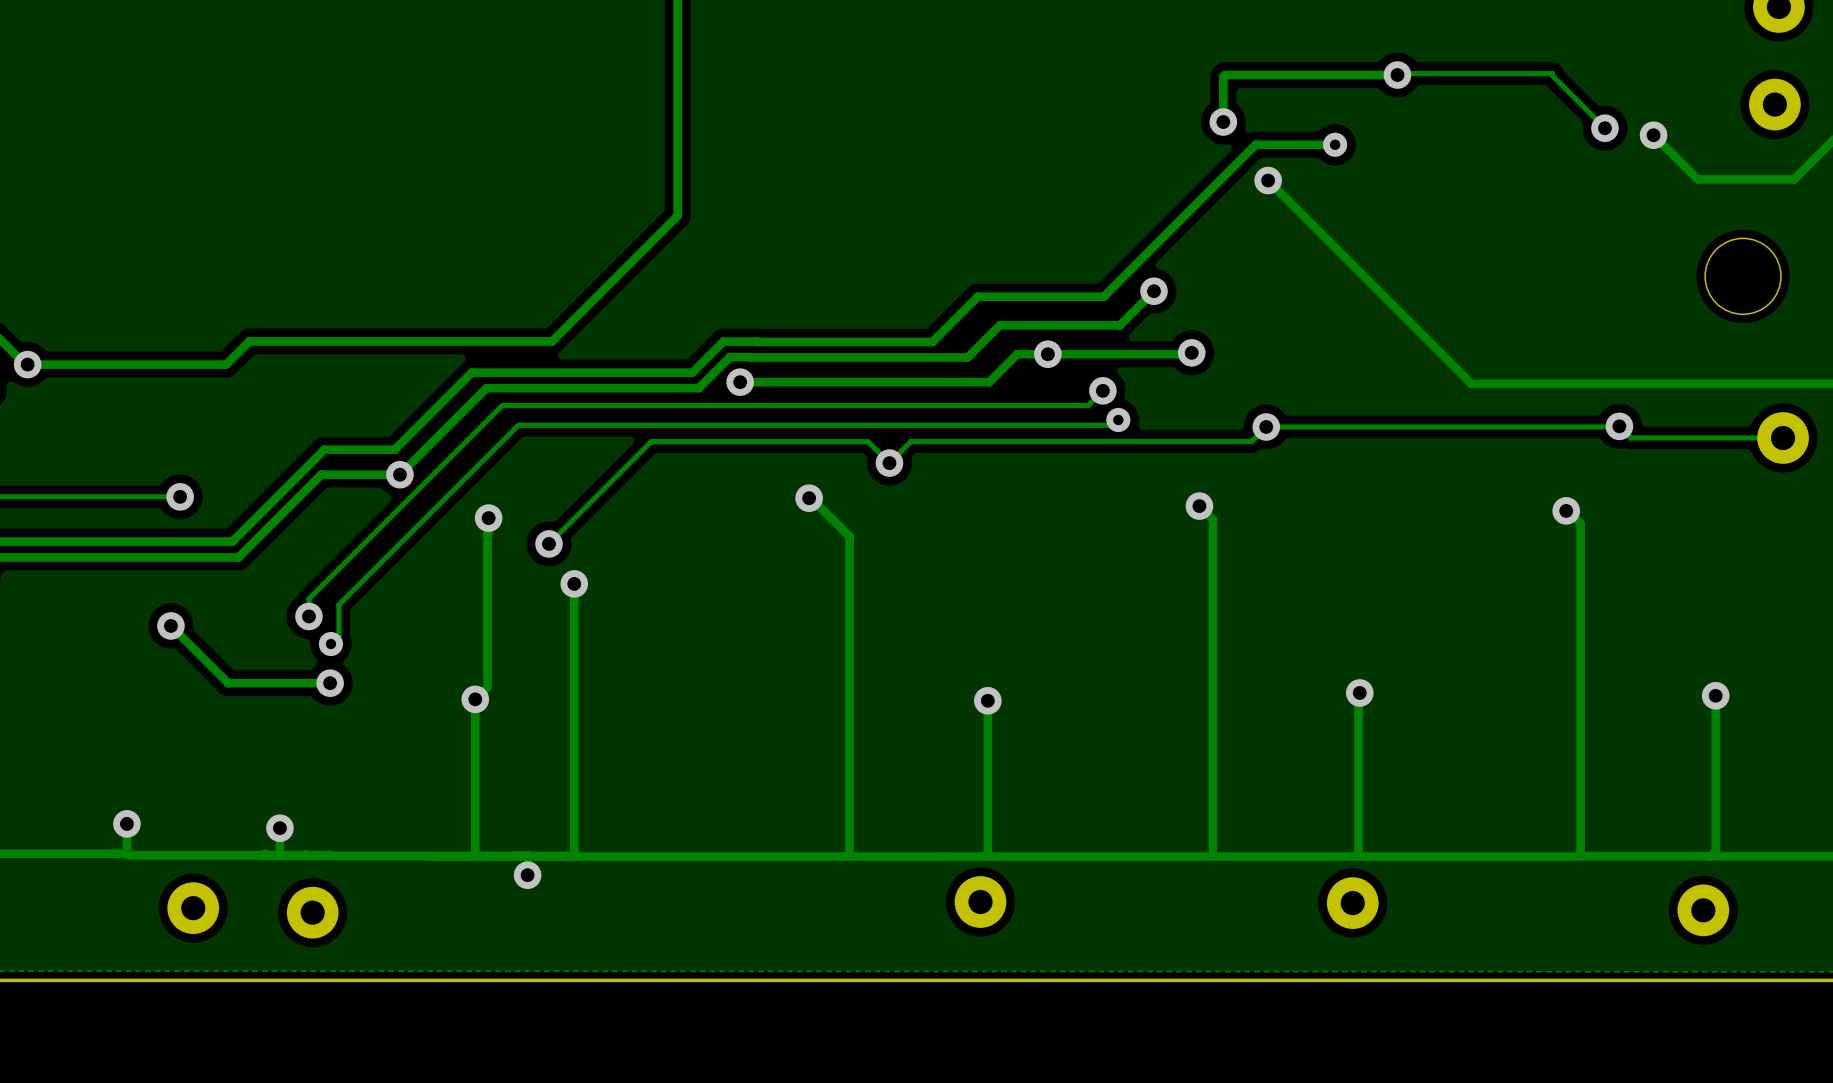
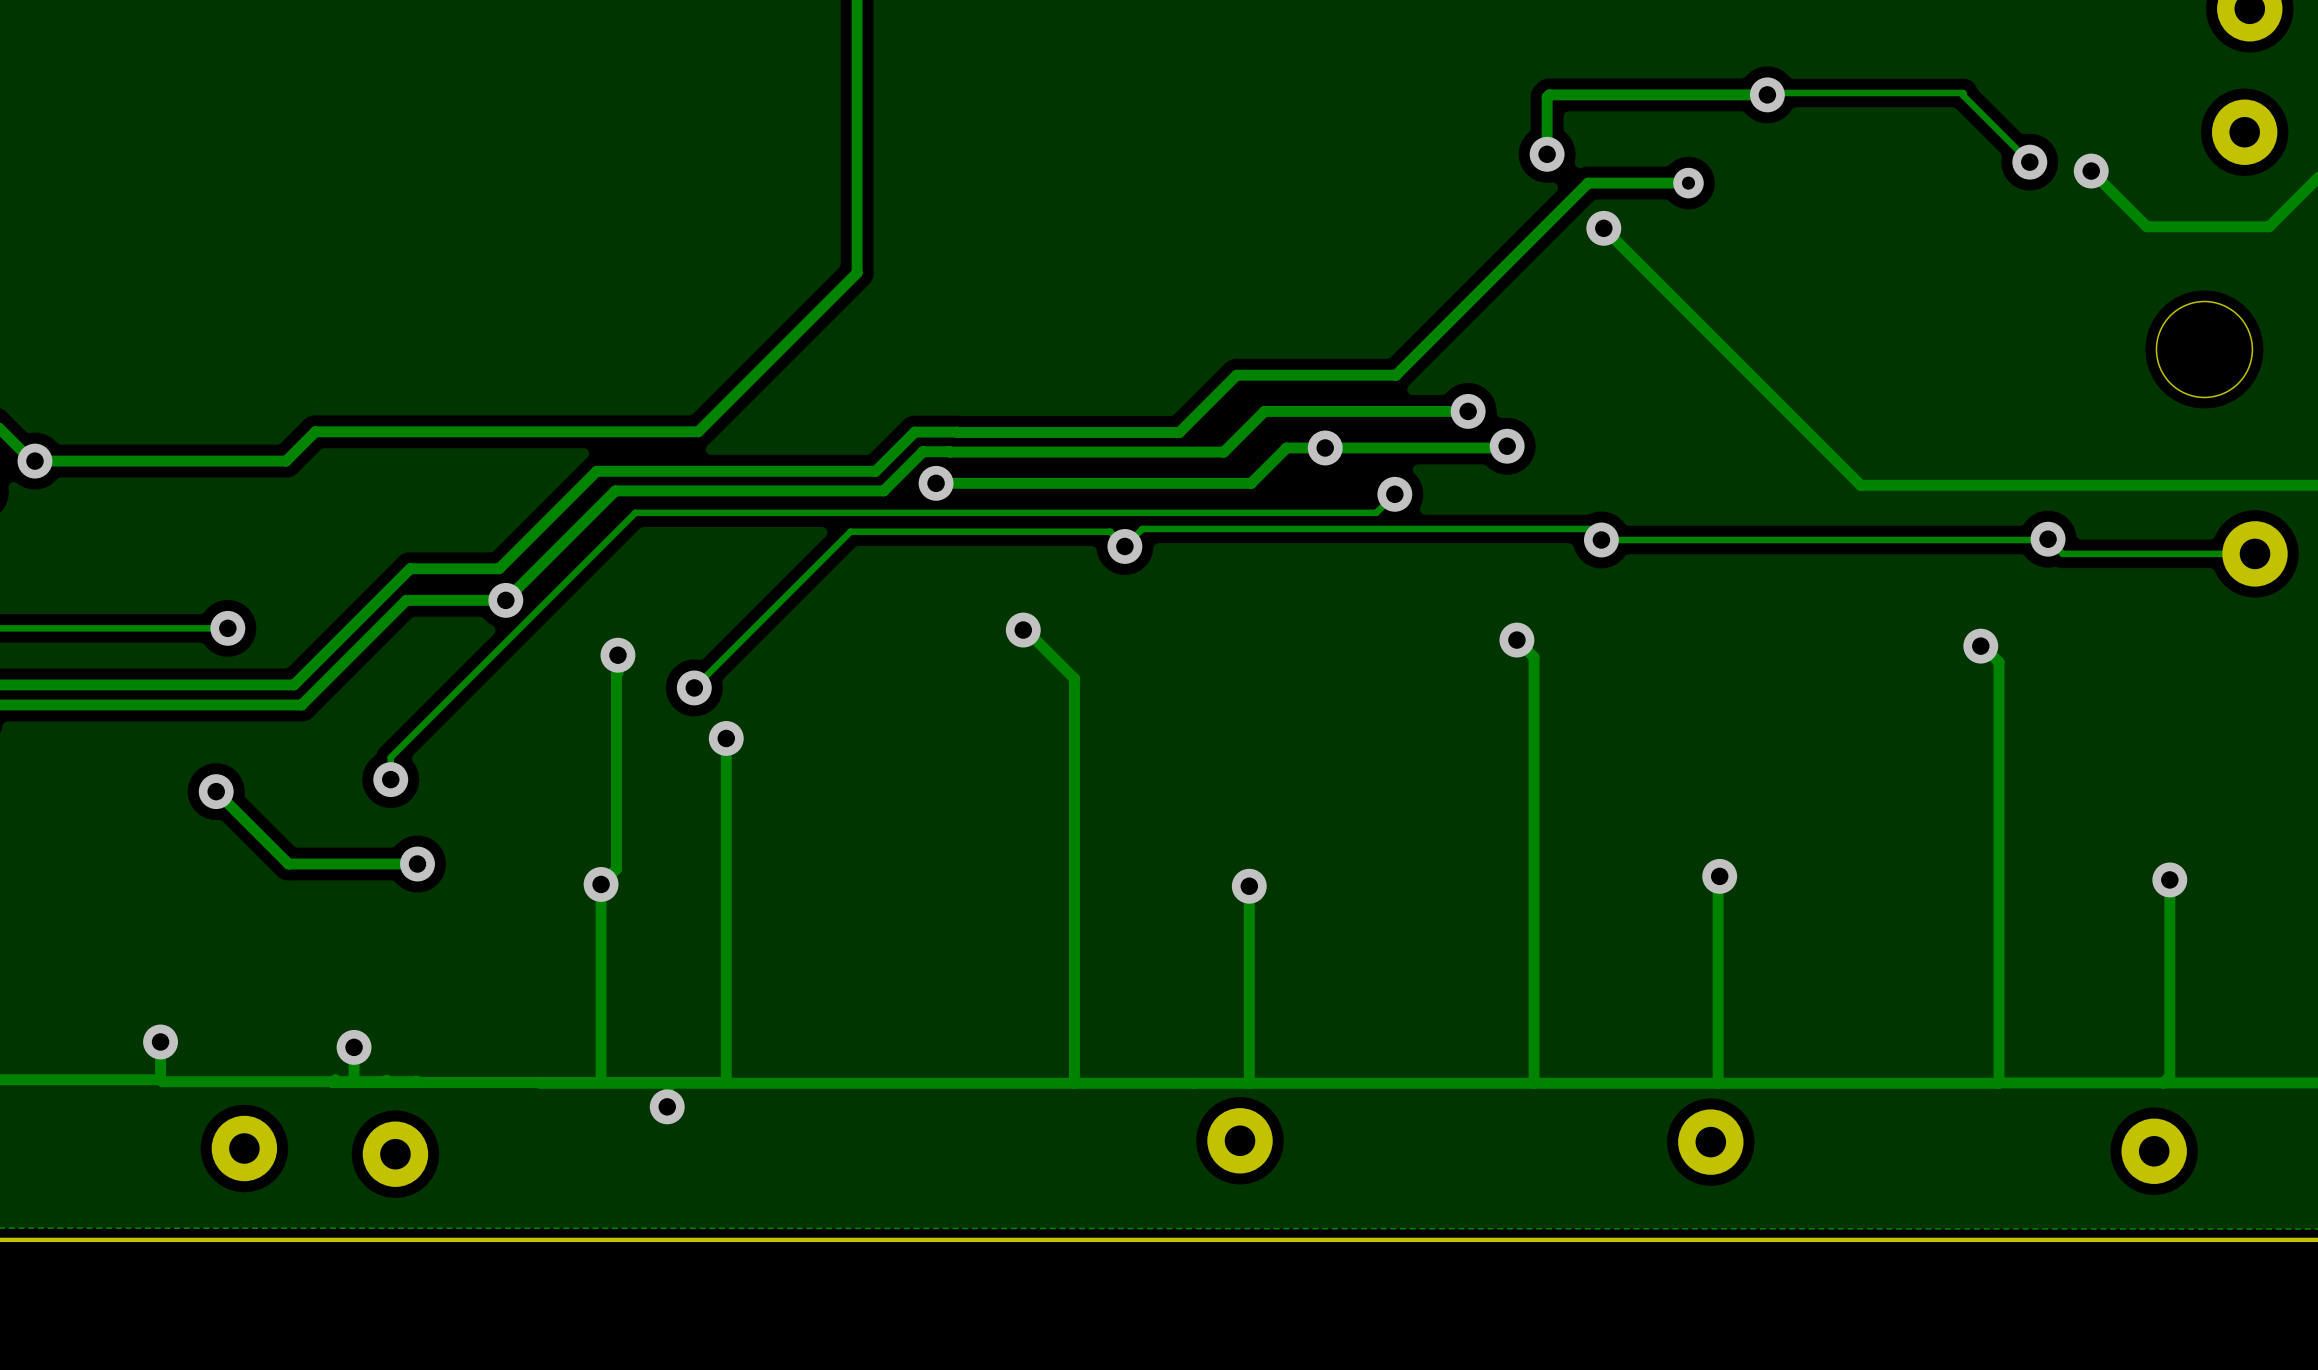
track: (1154, 291) (1119, 325) -> (1468, 411) (1416, 411)
via position: (1154, 291) -> (1468, 411)
track: (1118, 419) (1113, 425) (518, 425) (338, 604) (338, 636) (330, 644) -> none
via: (1118, 419) -> none
track: (1266, 426) (1251, 441) (911, 441) (889, 463) (868, 441) (651, 441) -> (1601, 539) (1590, 528) (1142, 528) (1124, 546) (1110, 531) (850, 531) (823, 558)
via position: (889, 463) -> (1124, 546)
via: (330, 644) -> none

